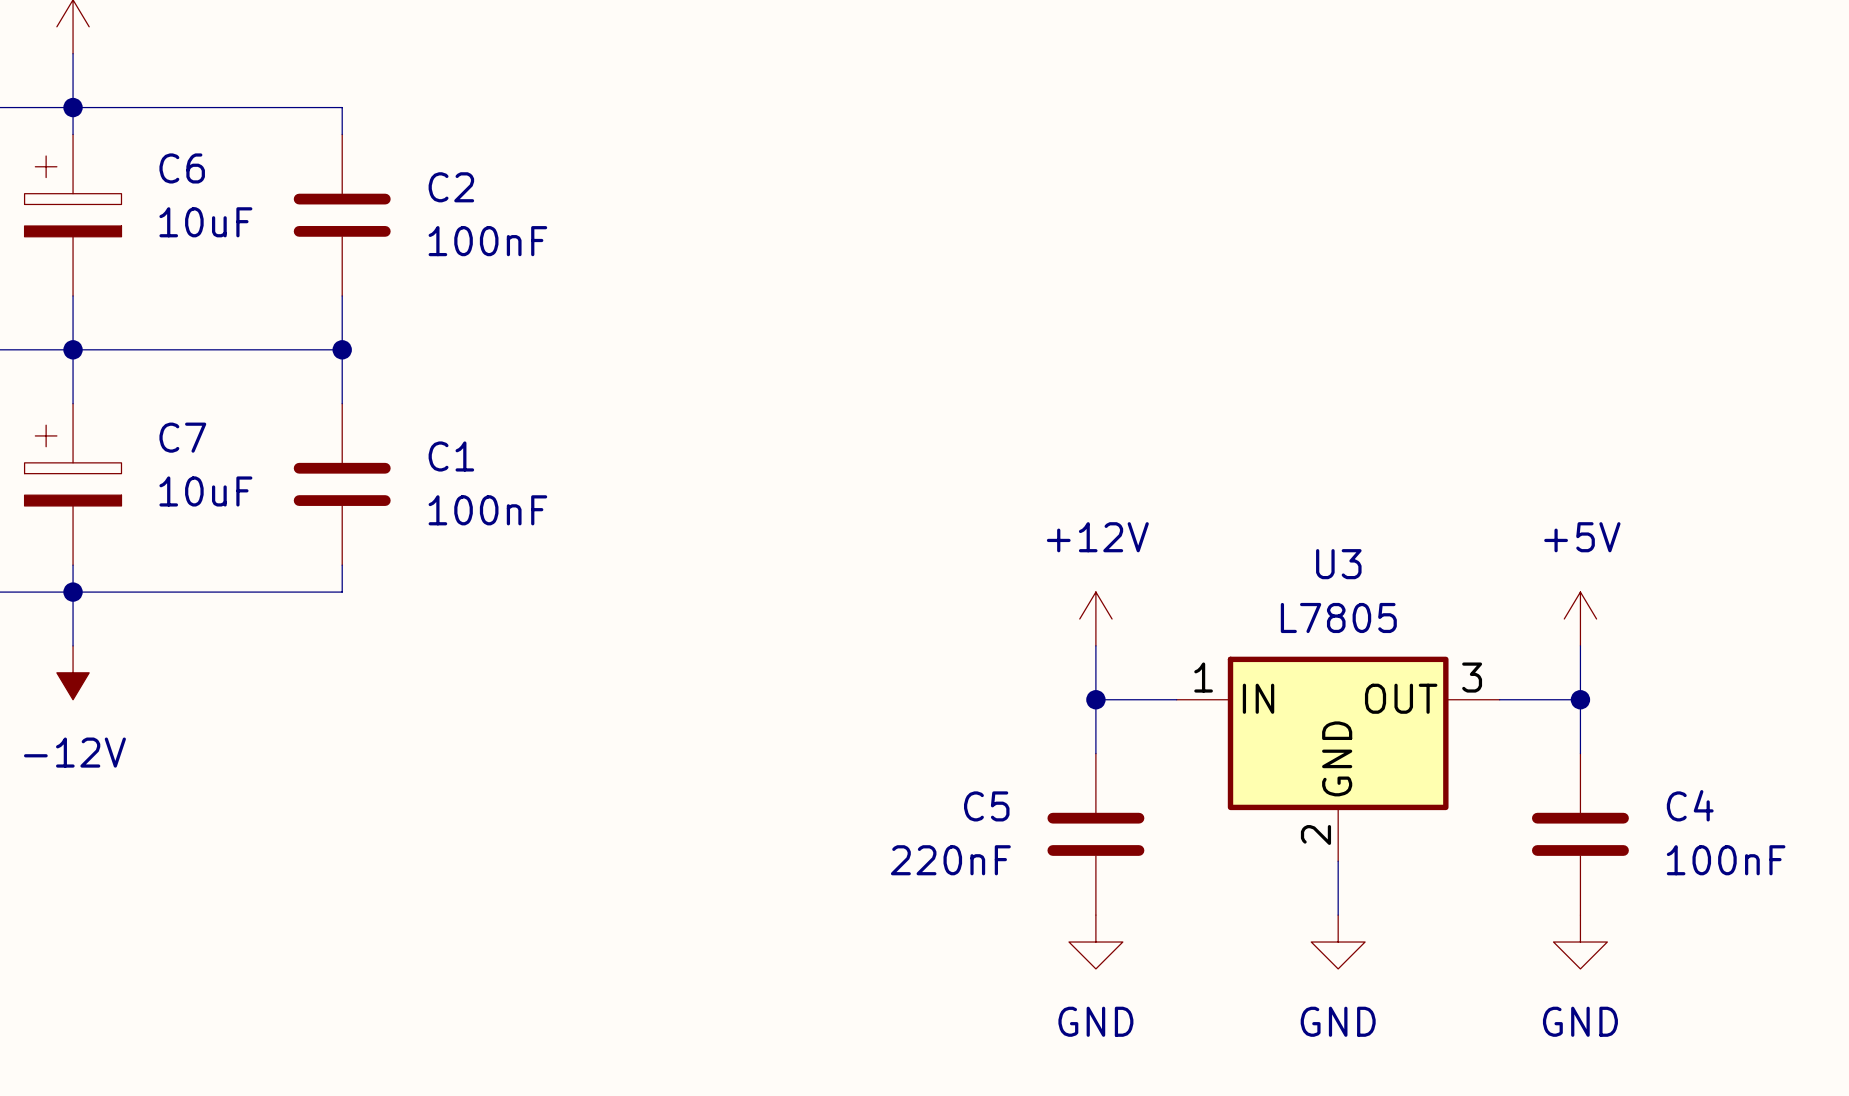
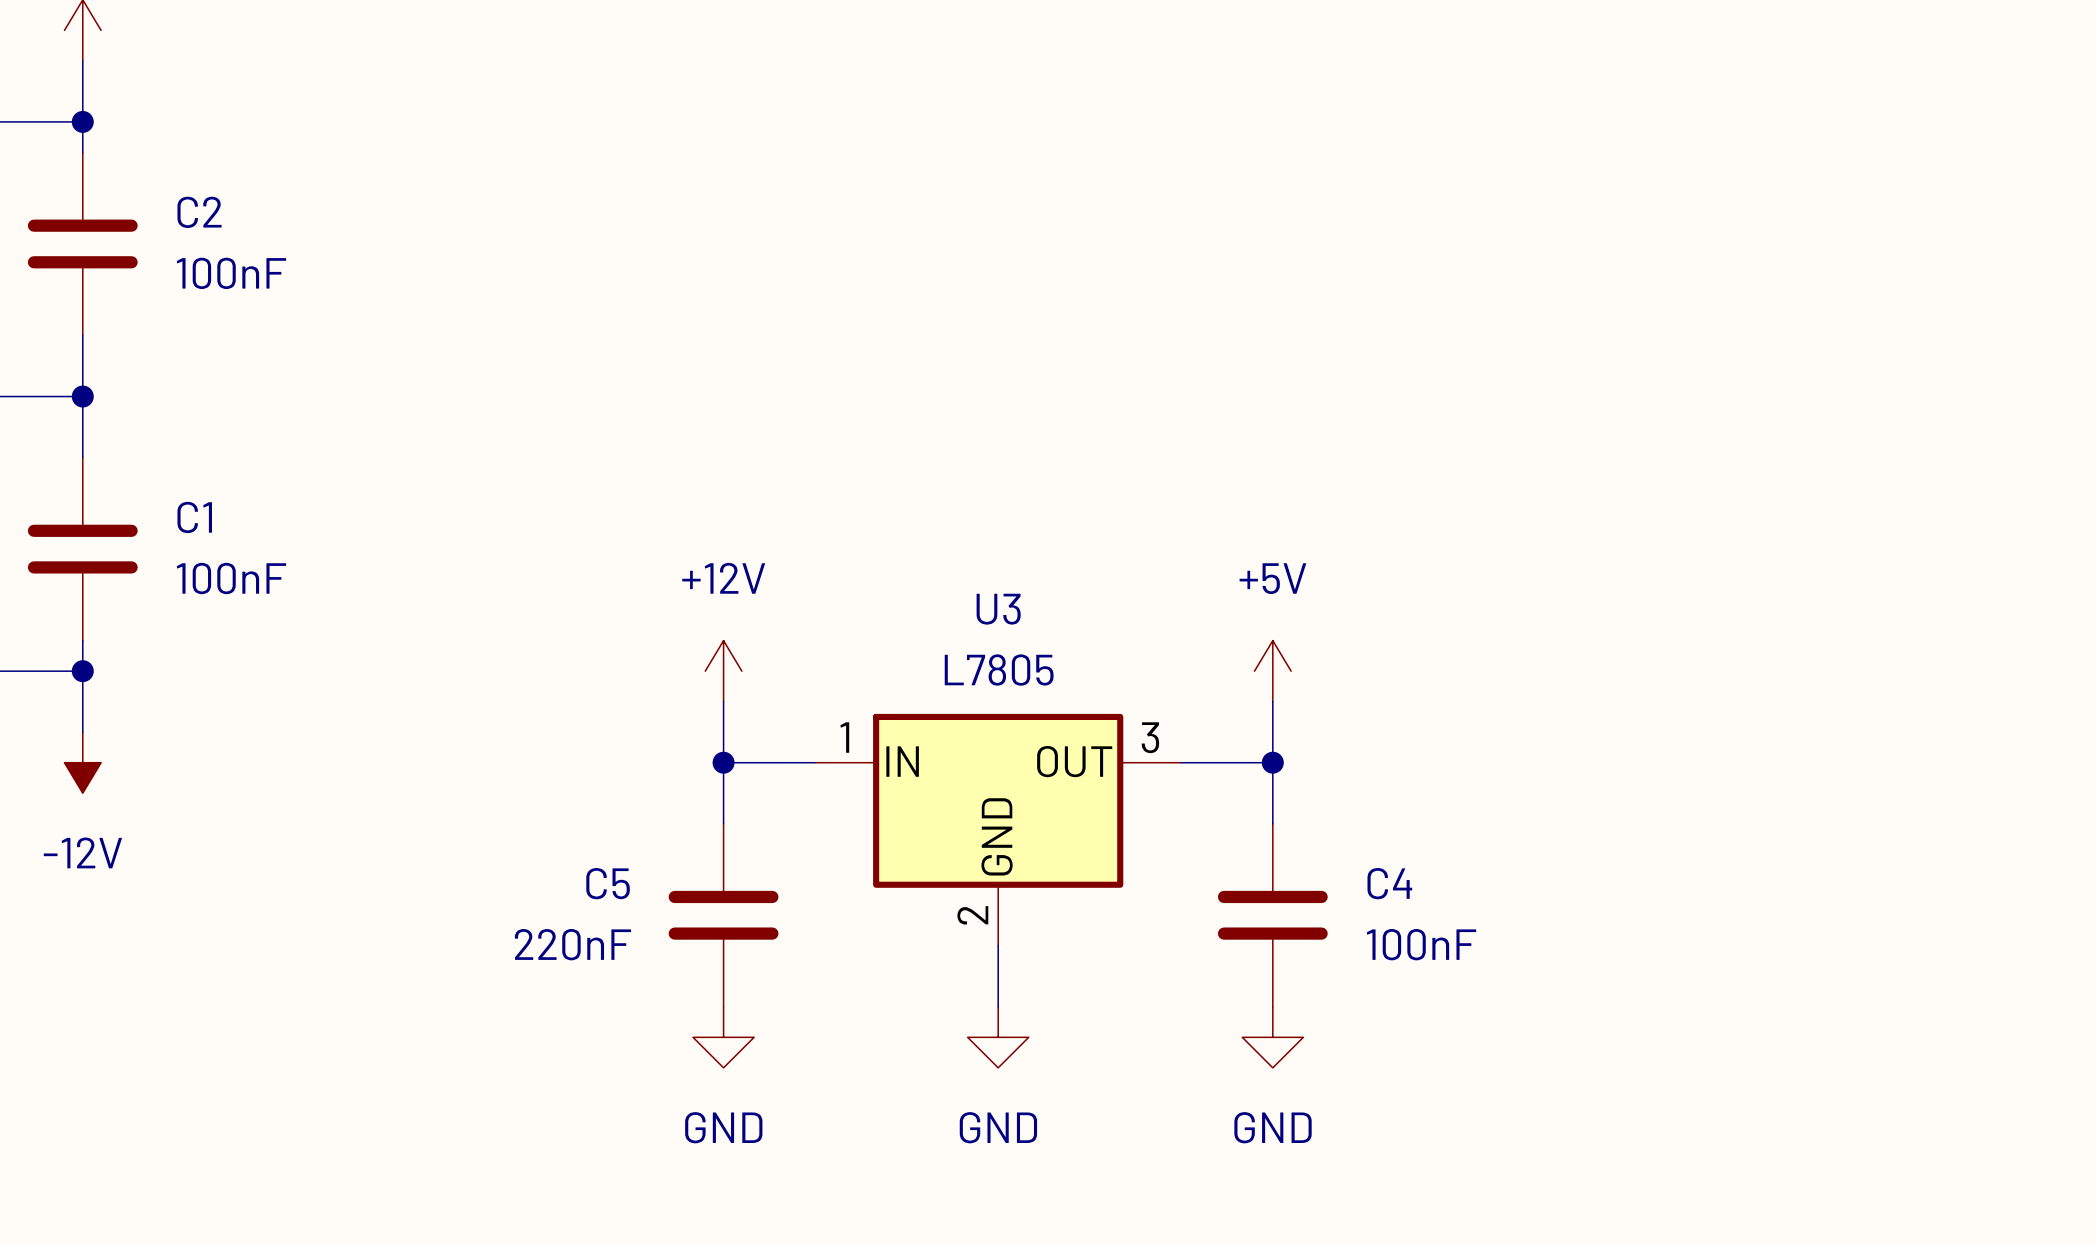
wire: (73, 107) (342, 107) (342, 134) -> none
C6: 10uF (73, 215) -> none
C2 position: (342, 215) -> (82, 243)
wire: (342, 295) (342, 403) -> none
wire: (73, 349) (342, 349) -> none
junction: (342, 349) -> none
C7: 10uF (73, 484) -> none
C1 position: (342, 484) -> (82, 549)
wire: (342, 565) (342, 592) (73, 592) -> none
power symbol position: +12V (1095, 618) -> +12V (723, 671)
power symbol position: +5V (1580, 618) -> +5V (1272, 671)
wire: (1095, 645) (1095, 753) -> (723, 701) (723, 823)
wire: (1580, 645) (1580, 753) -> (1272, 701) (1272, 823)
junction: none -> (723, 762)
wire: (1095, 699) (1176, 699) -> (723, 762) (815, 762)
junction position: (1095, 699) -> (1272, 762)
wire: (1499, 699) (1580, 699) -> (1181, 762) (1272, 762)
junction: (1580, 699) -> none
U3 position: (1338, 758) -> (998, 829)
C5 position: (1095, 834) -> (723, 915)
C4 position: (1580, 834) -> (1272, 915)
wire: (1338, 861) (1338, 915) -> (998, 945) (998, 1006)
power symbol: none -> GND (723, 1037)
power symbol: none -> GND (998, 1037)
power symbol position: GND (1095, 942) -> GND (1272, 1037)
power symbol: GND (1338, 942) -> none
power symbol: GND (1580, 942) -> none

